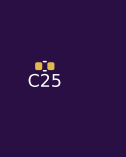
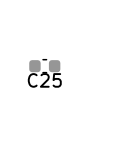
C25 footprint: [35, 60, 55, 72] -> [29, 58, 61, 74]

